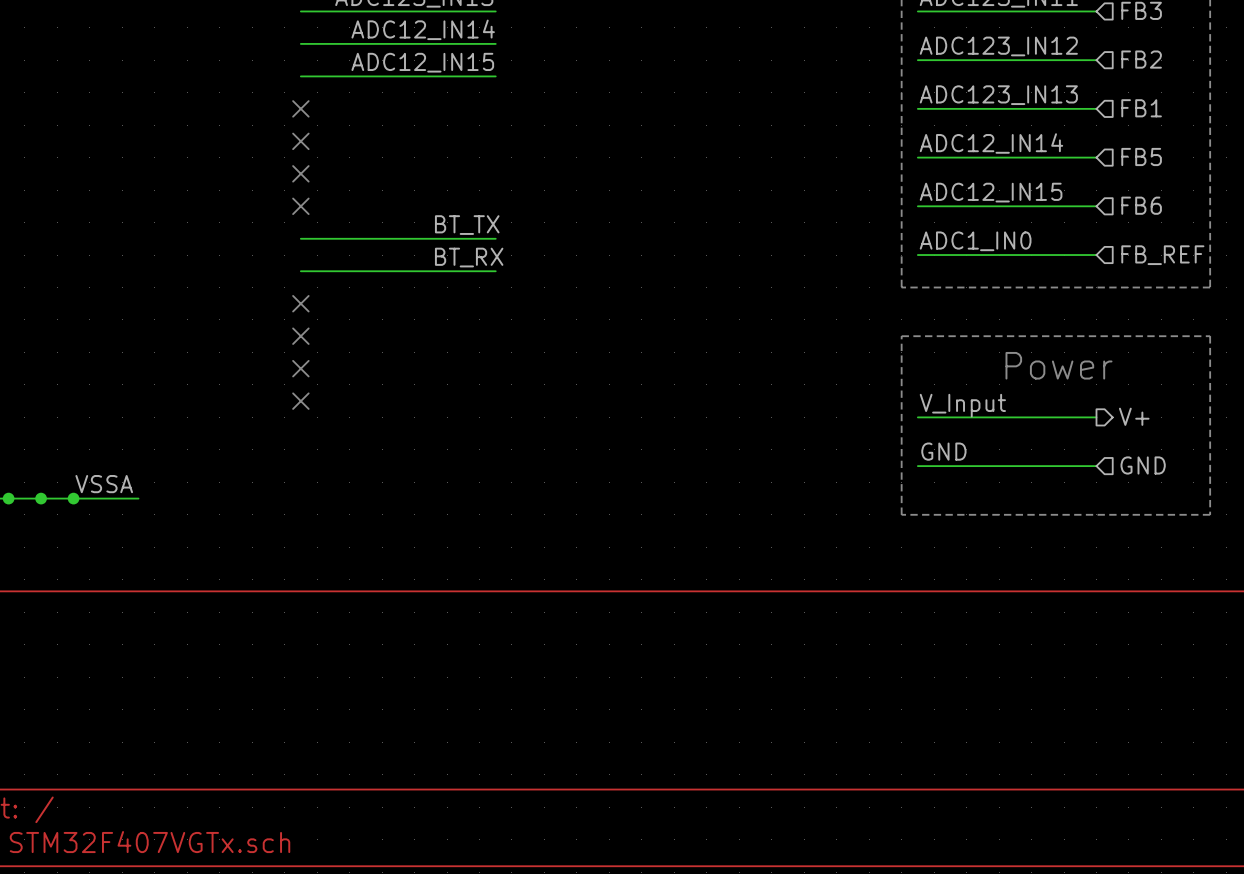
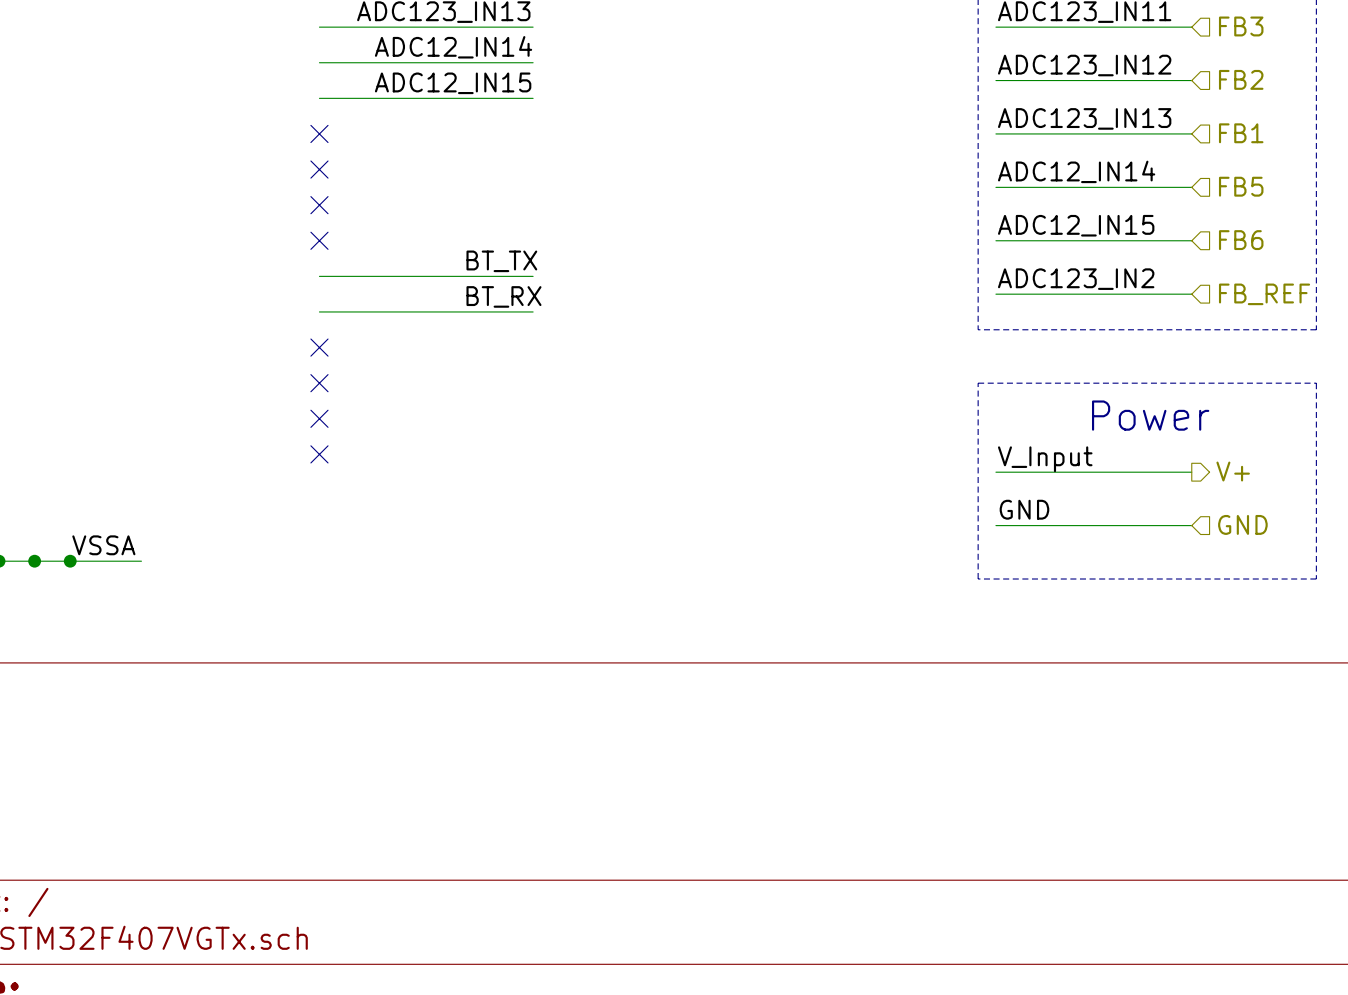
label: ADC1_IN0 (975, 241) -> ADC123_IN2 (1076, 279)

